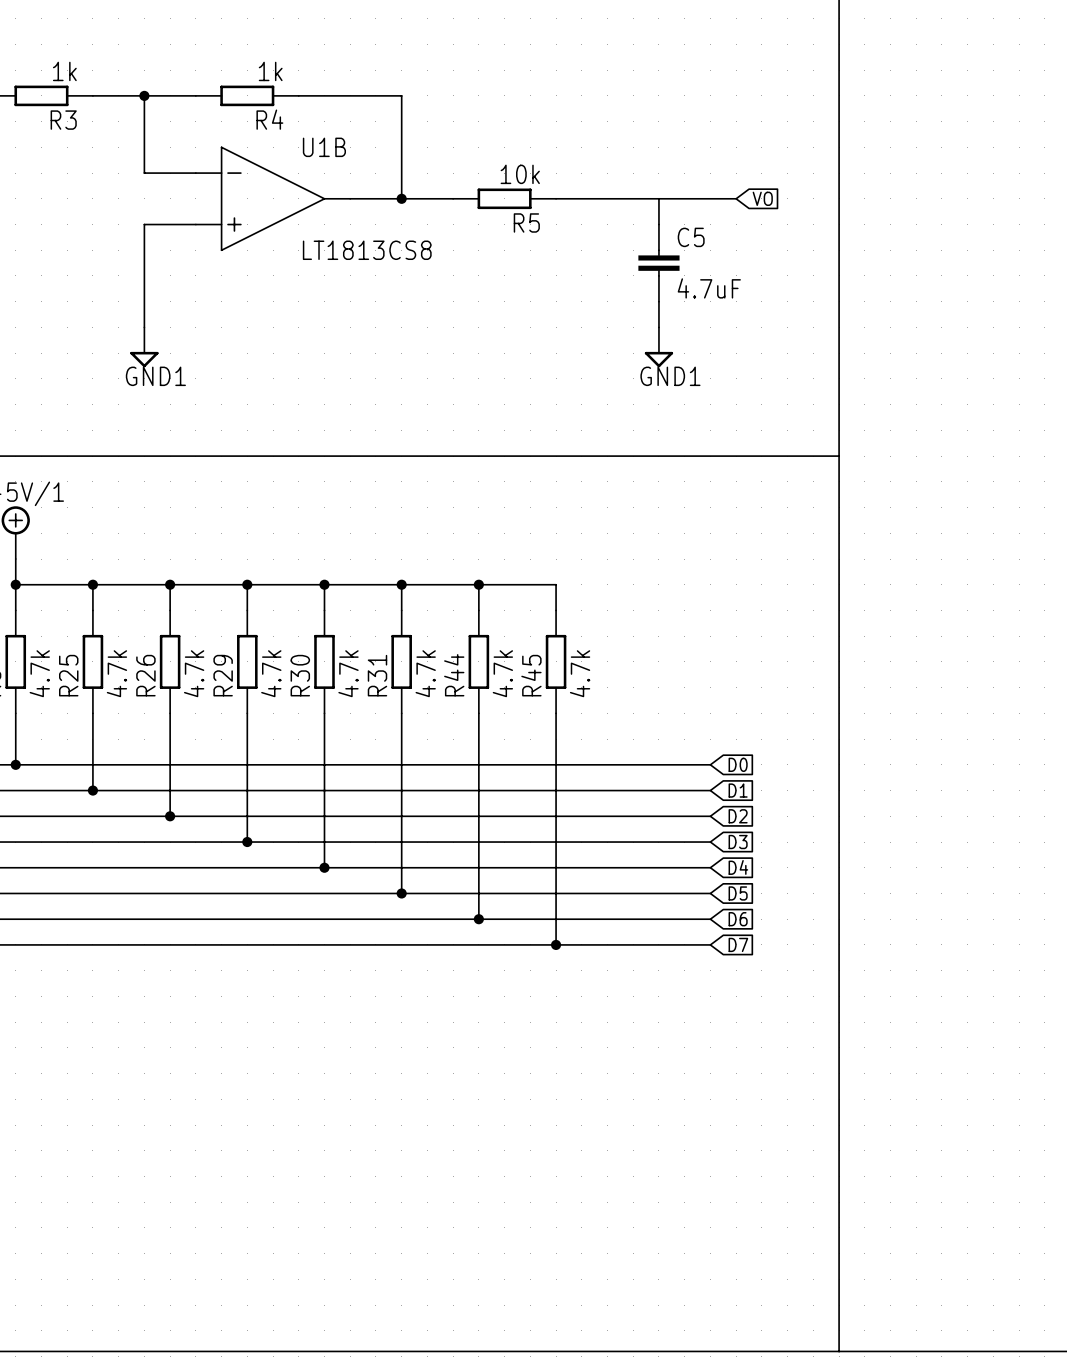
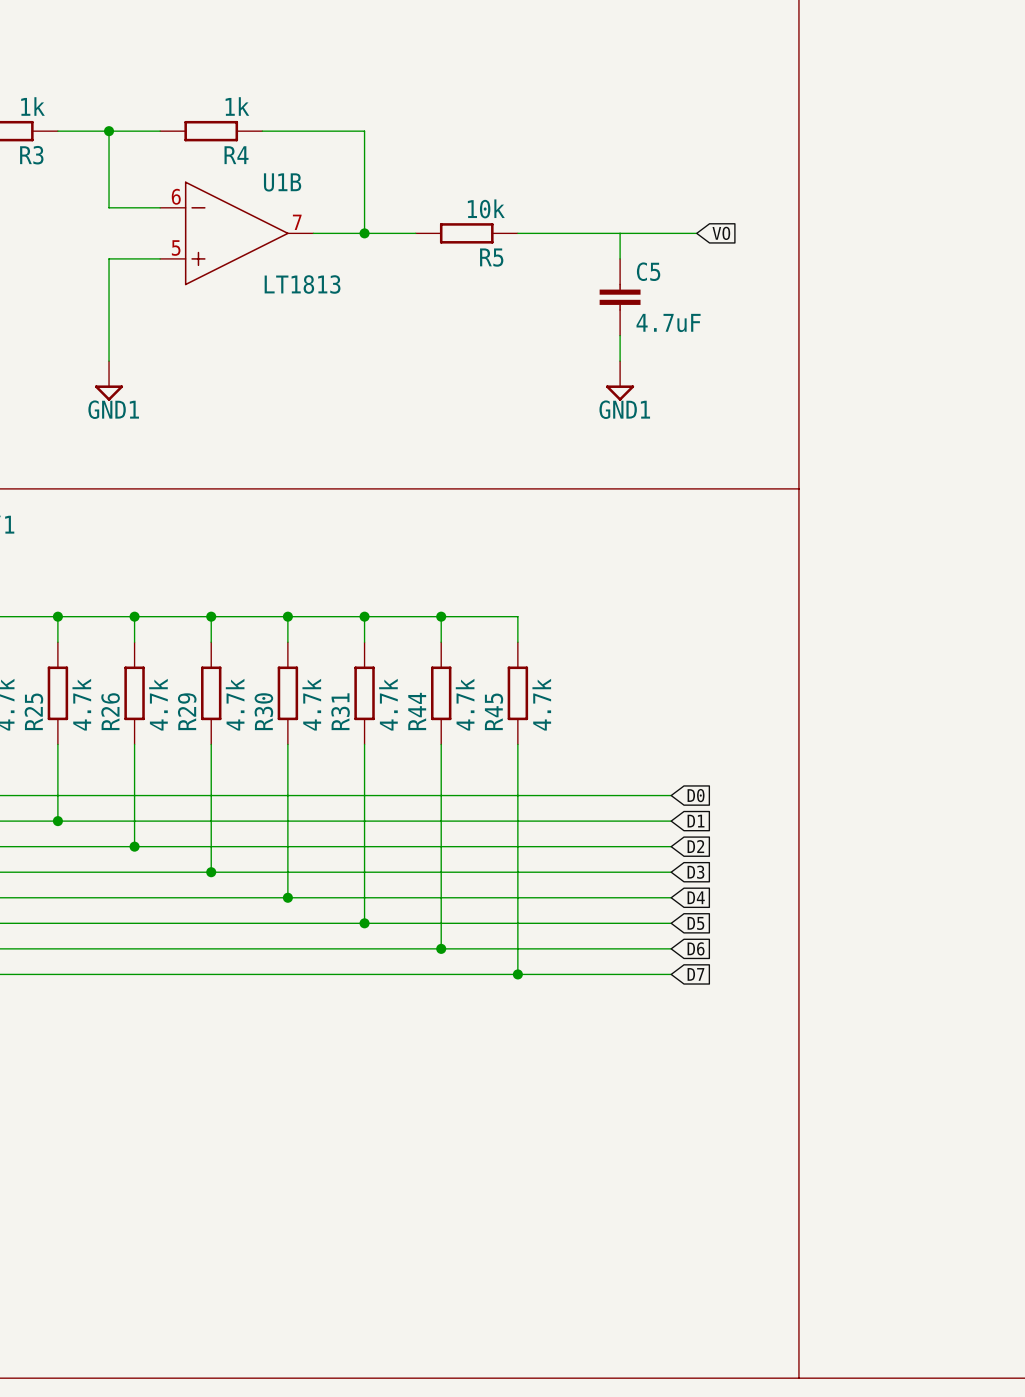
U1B pin number: none -> 6 (176, 196)
U1B pin number: none -> 7 (297, 222)
U1B pin number: none -> 5 (176, 248)
U1B value: LT1813CS8 (367, 250) -> LT1813 (302, 284)

